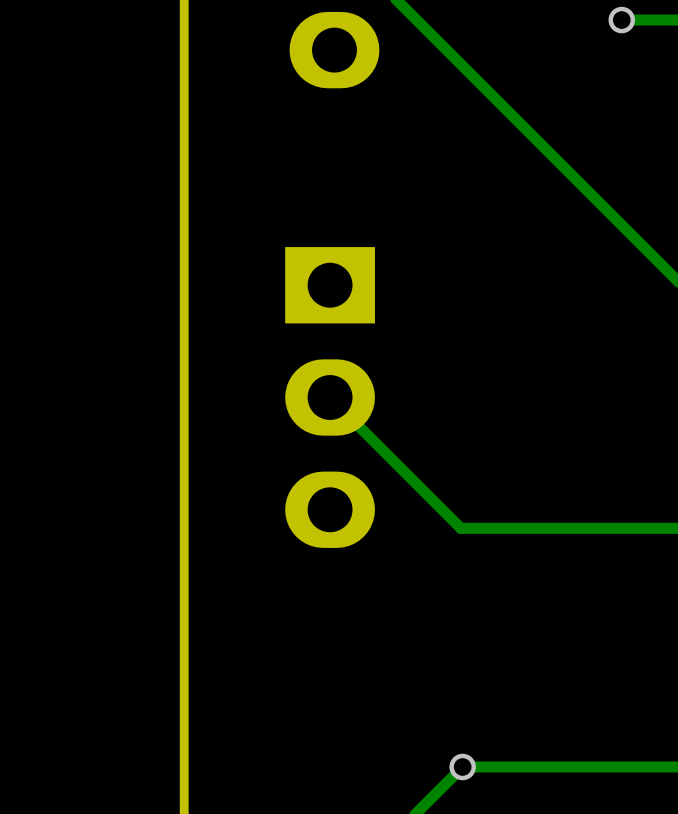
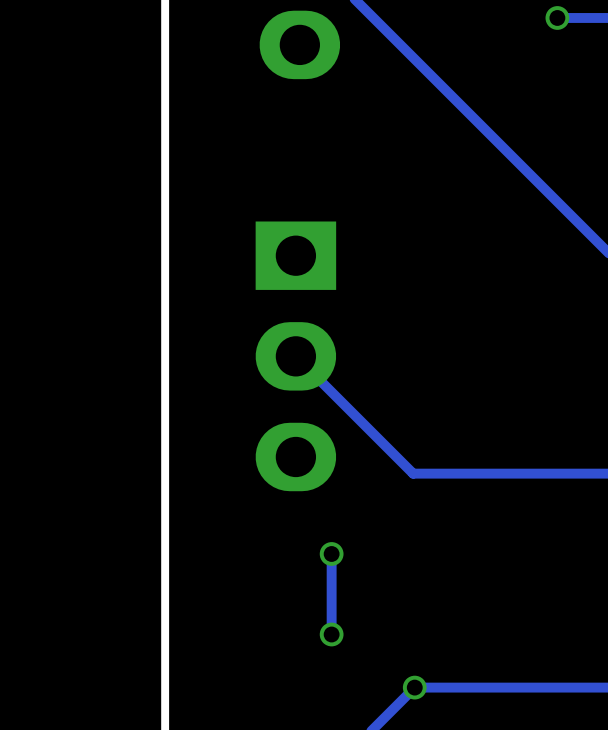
track: none -> (331, 553) (331, 634)
via: none -> (331, 553)
via: none -> (331, 634)

